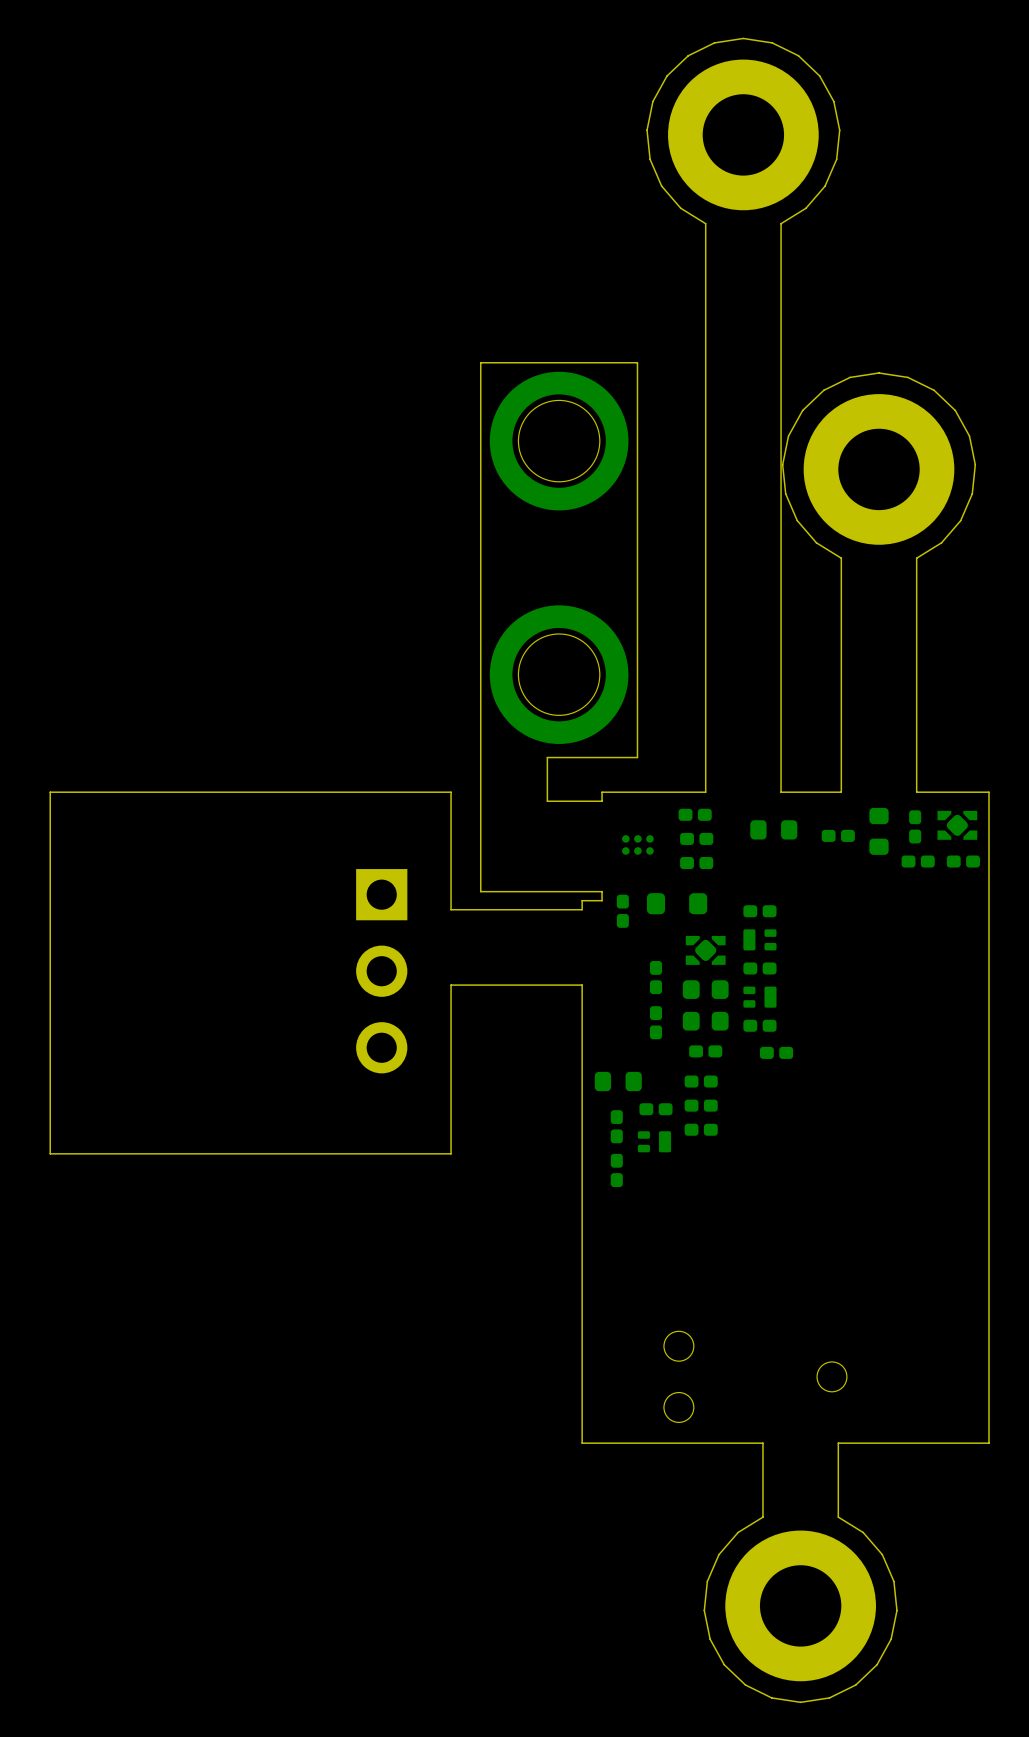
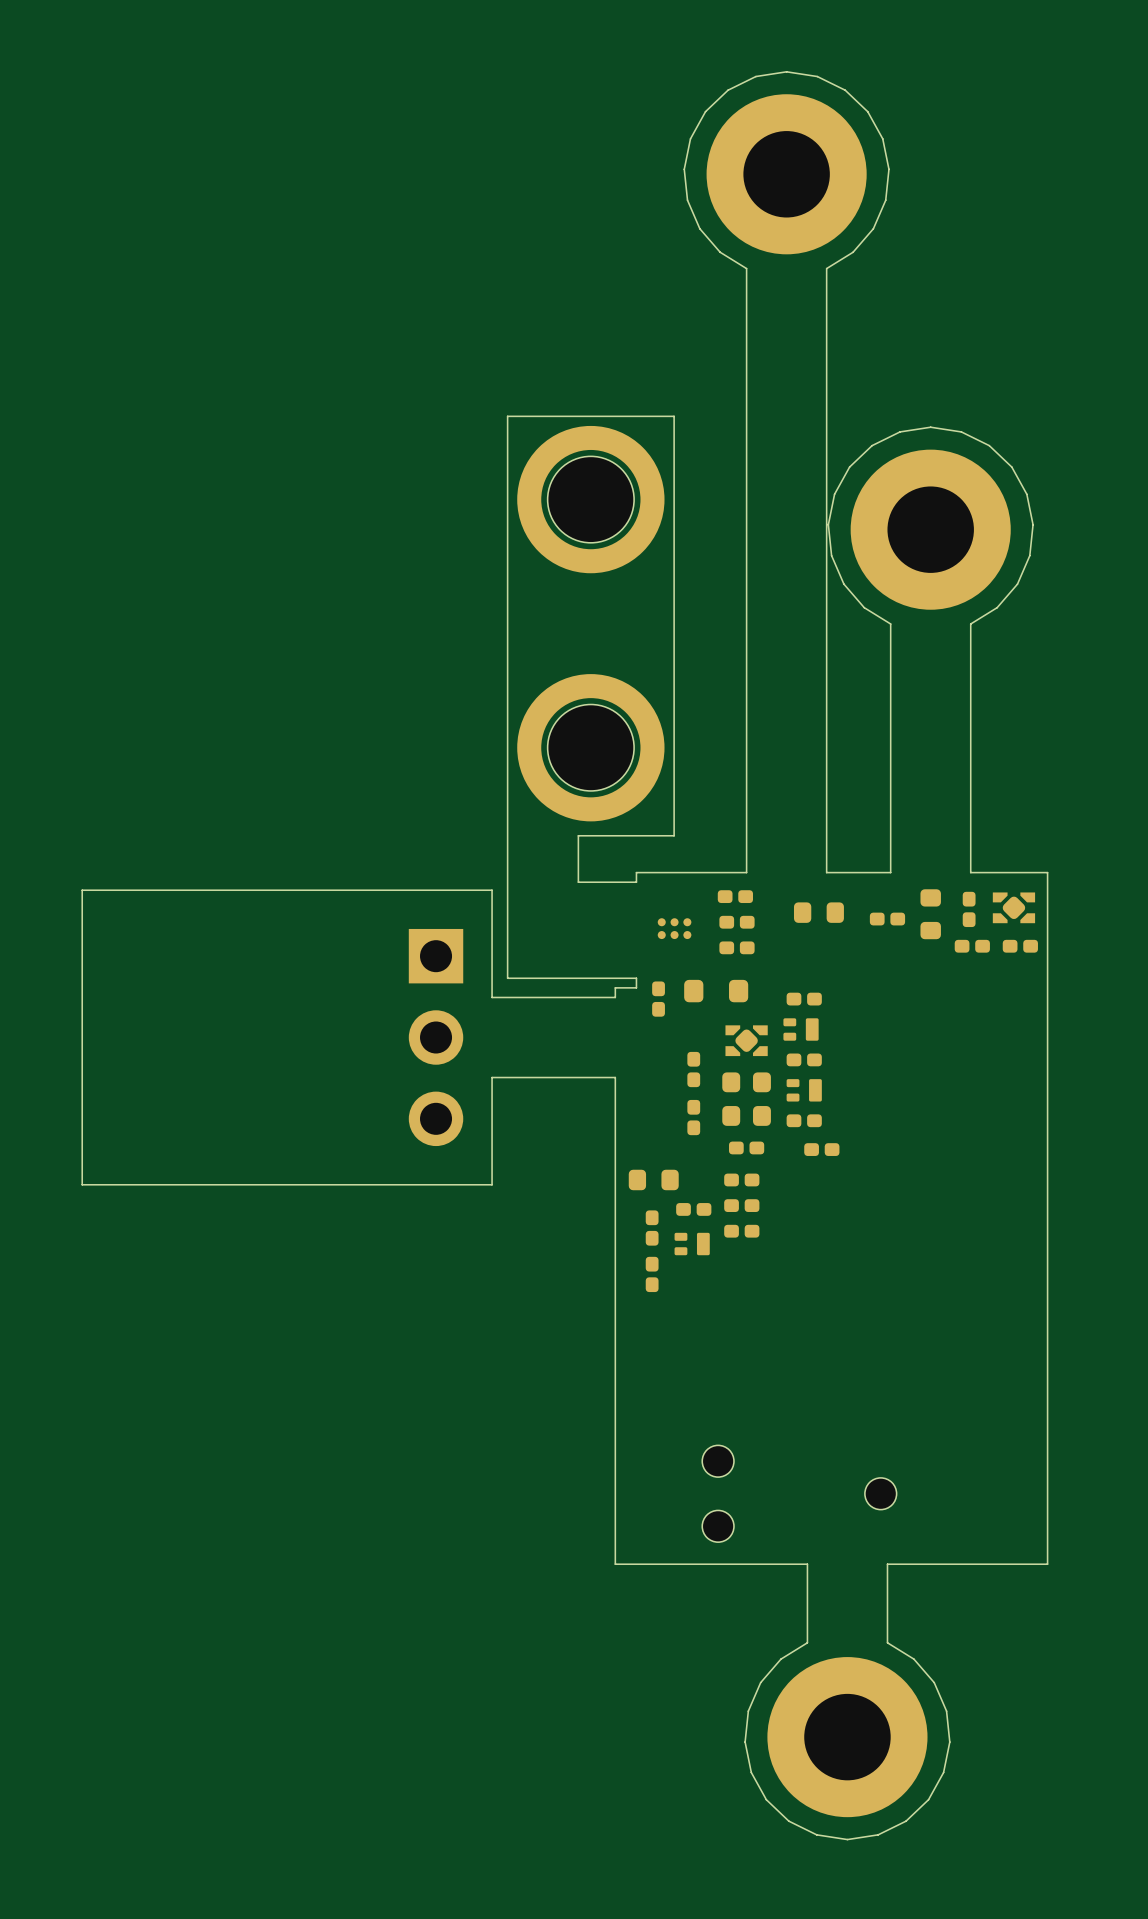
board edge: (466, 909) (451, 909) (451, 792) (50, 792) (50, 1153) (451, 1153) (451, 985) (466, 985) -> (492, 997) (492, 890) (82, 890) (82, 1184) (492, 1184) (492, 1077)
part rotation: 0° (759, 939) -> 180° (801, 1029)
part position: (381, 971) -> (436, 1037)

